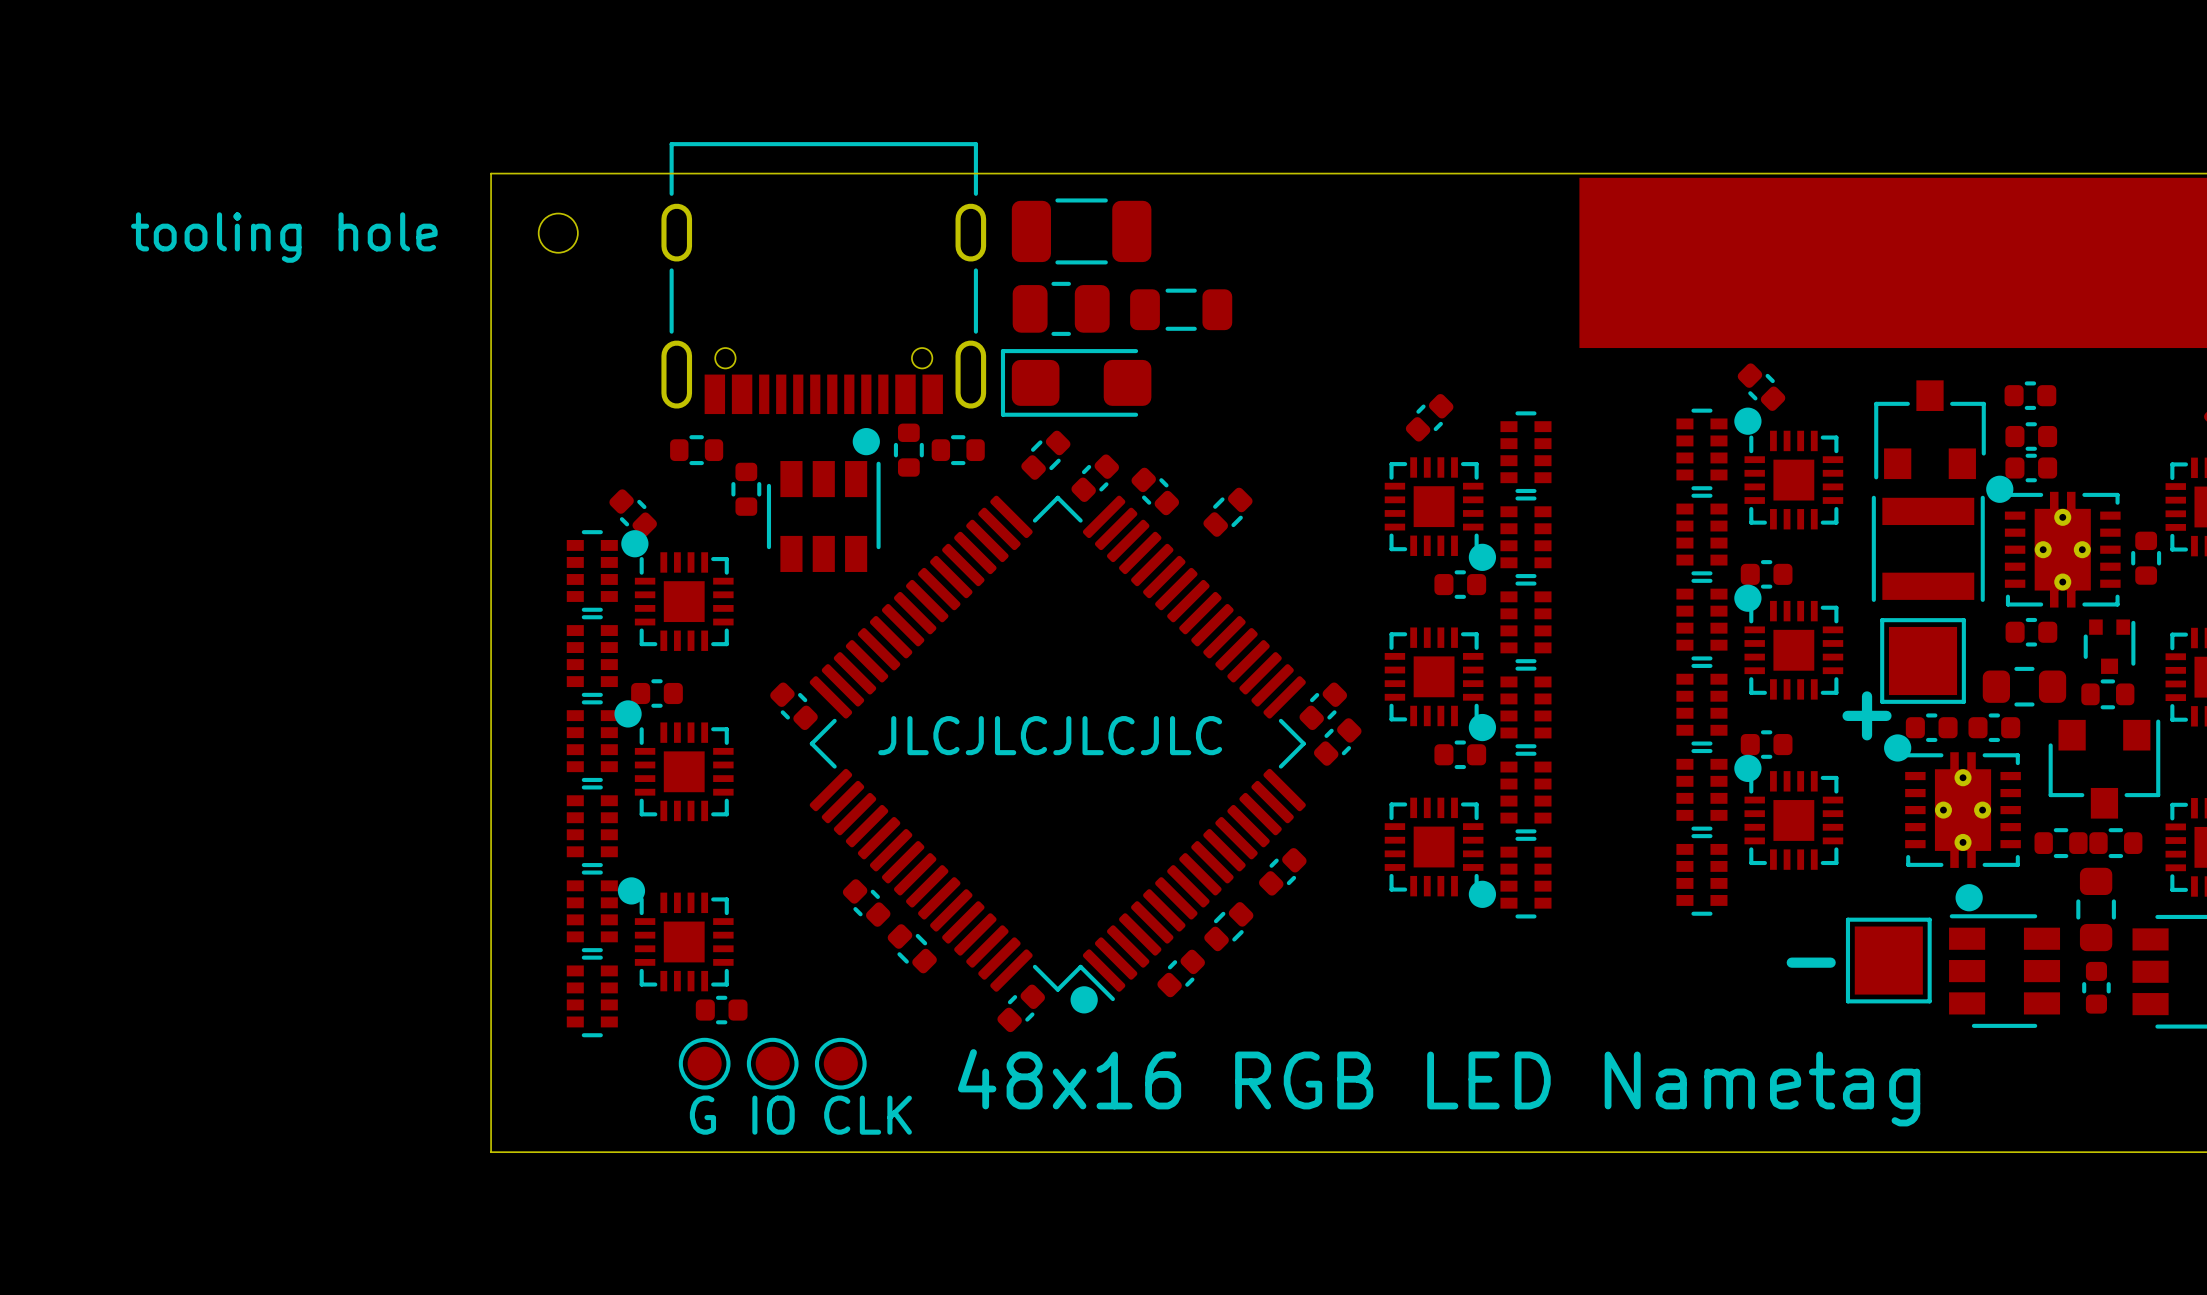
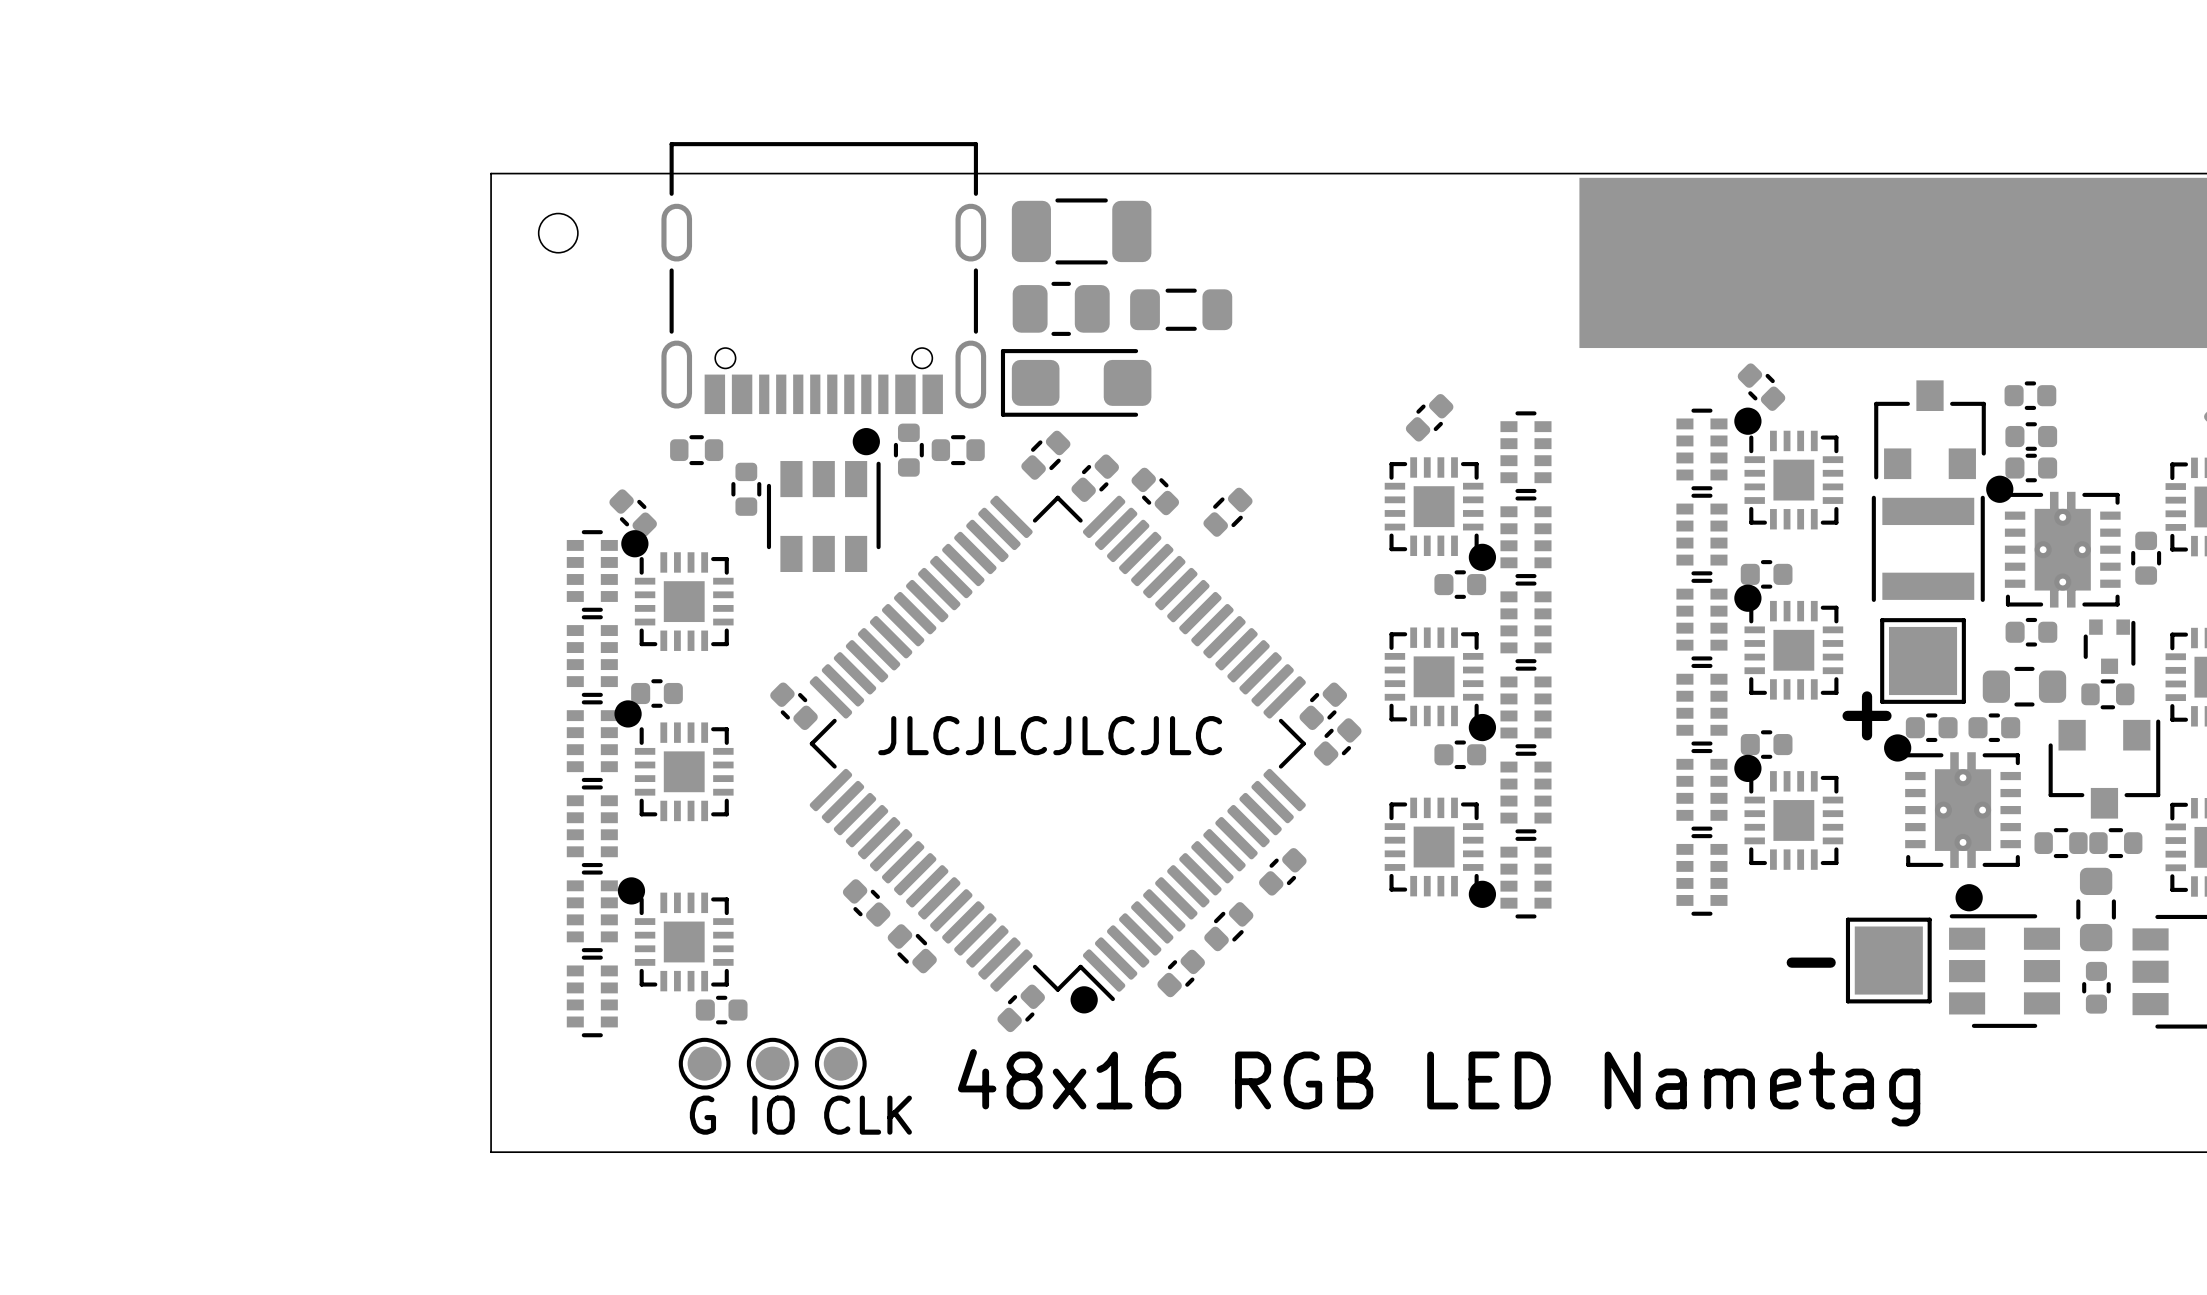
part text: tooling hole (284, 237) -> none

